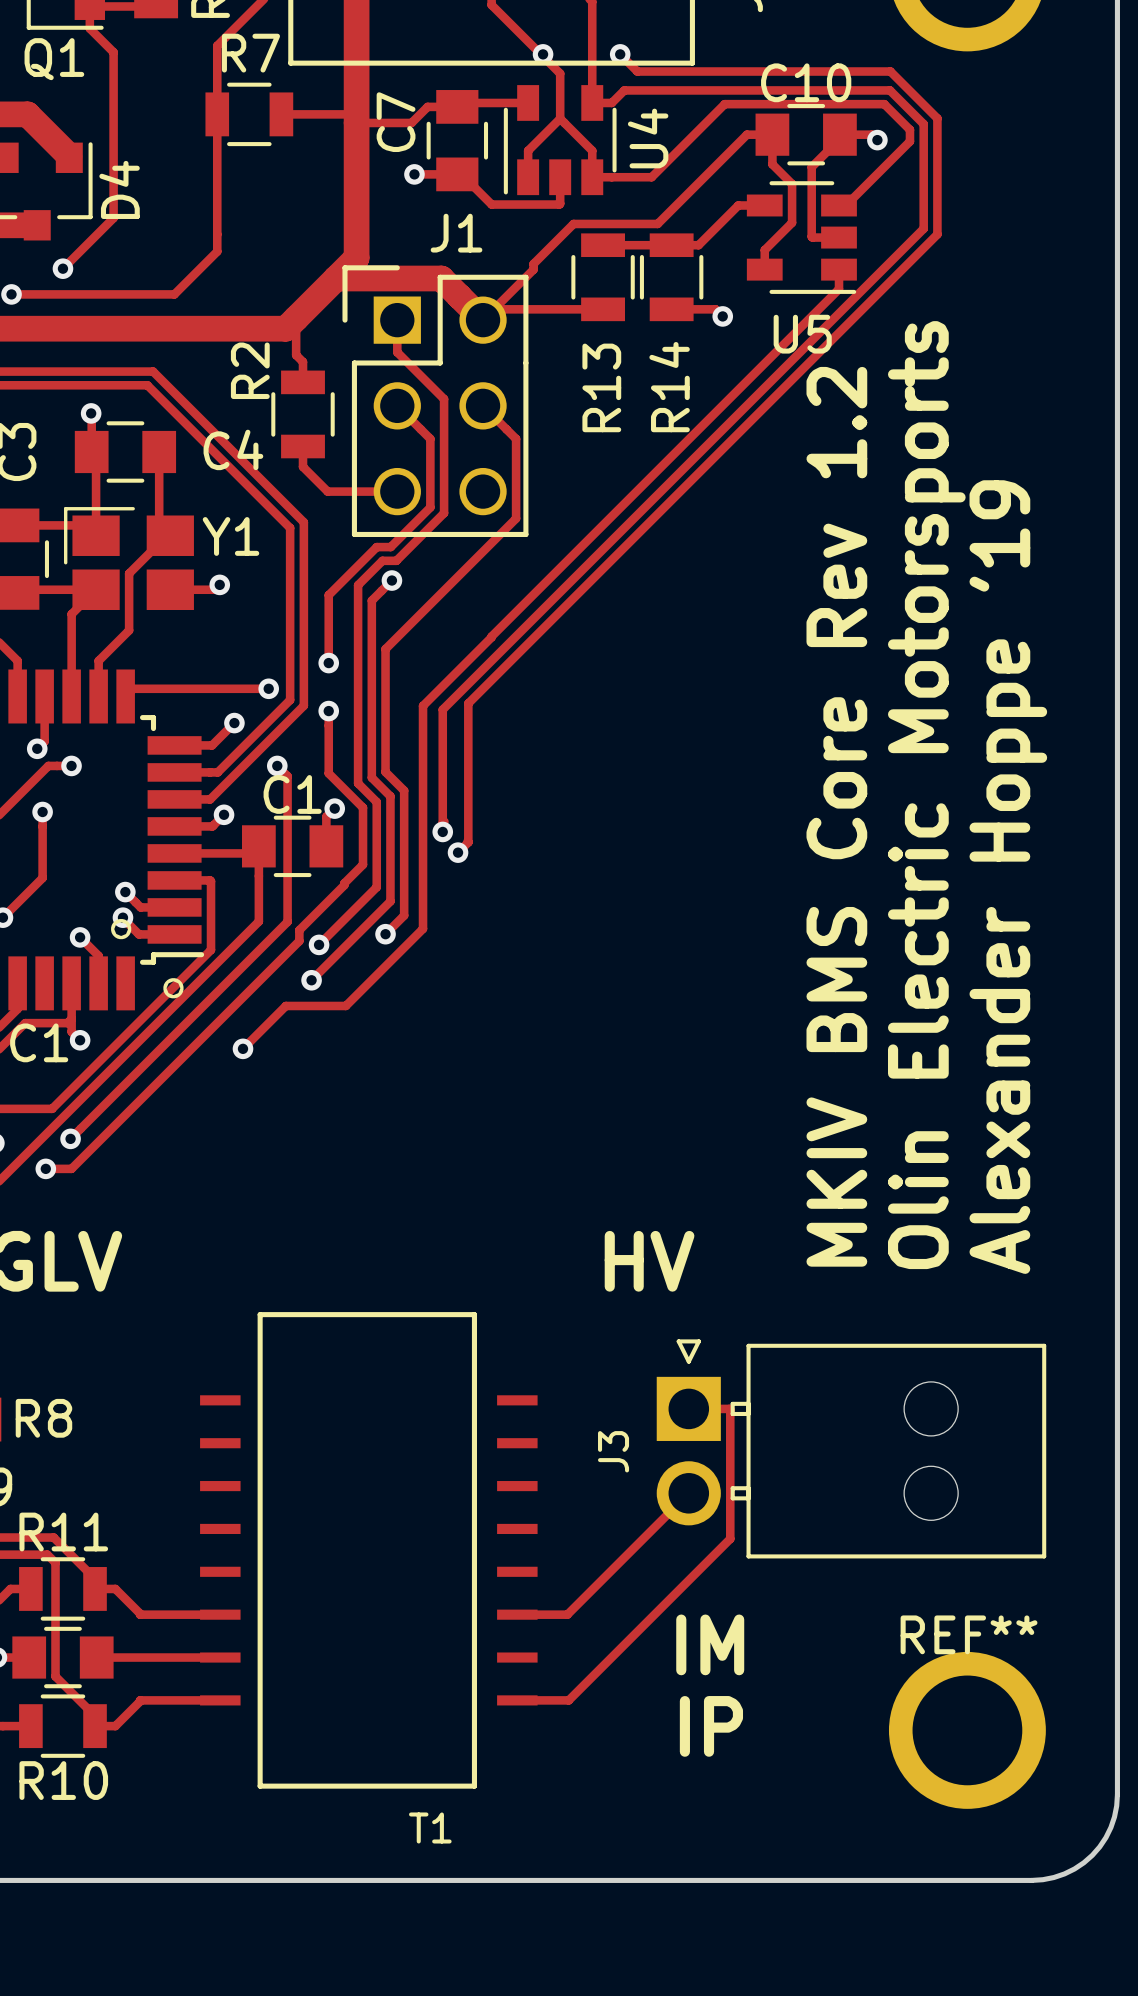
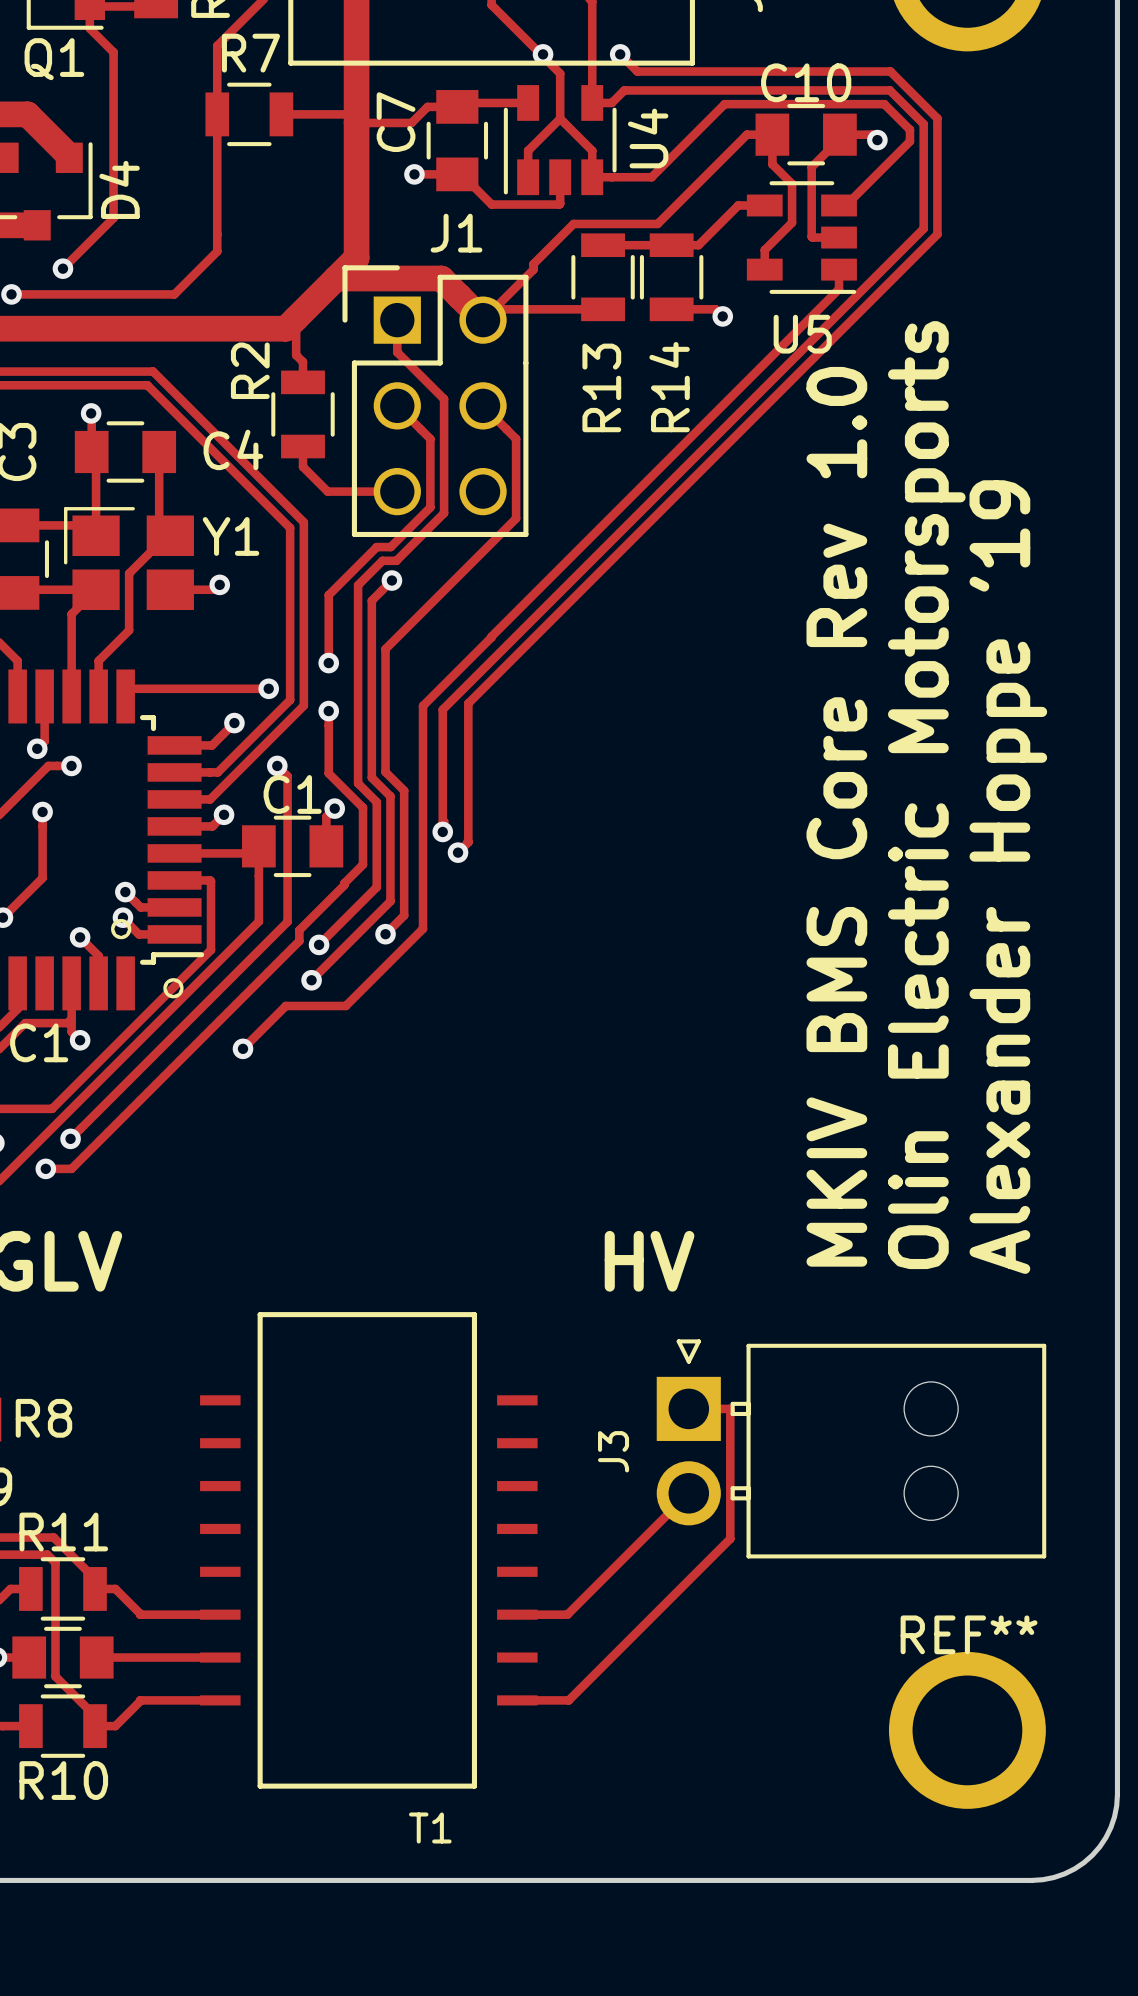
text: MKIV BMS Core Rev 1.2 (836, 816) -> MKIV BMS Core Rev 1.0 (836, 816)
text: IM (710, 1644) -> none
text: IP (711, 1726) -> none

